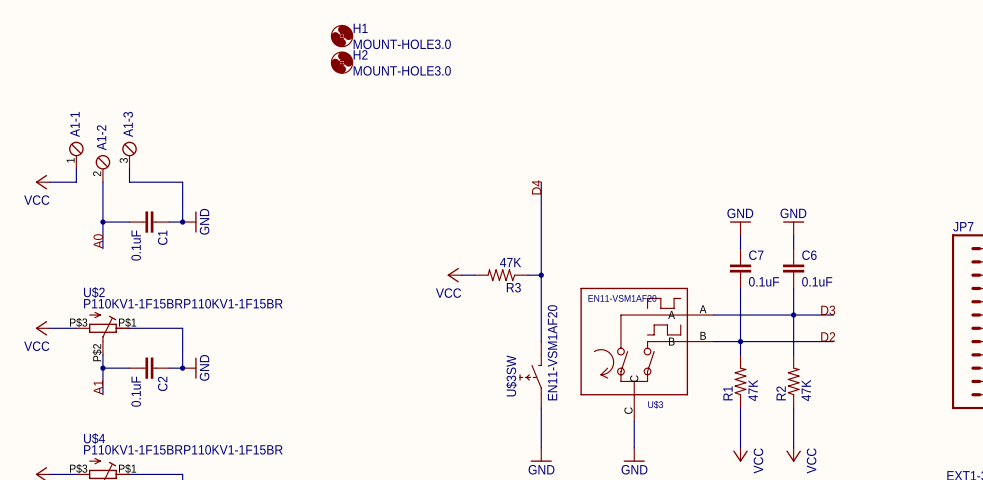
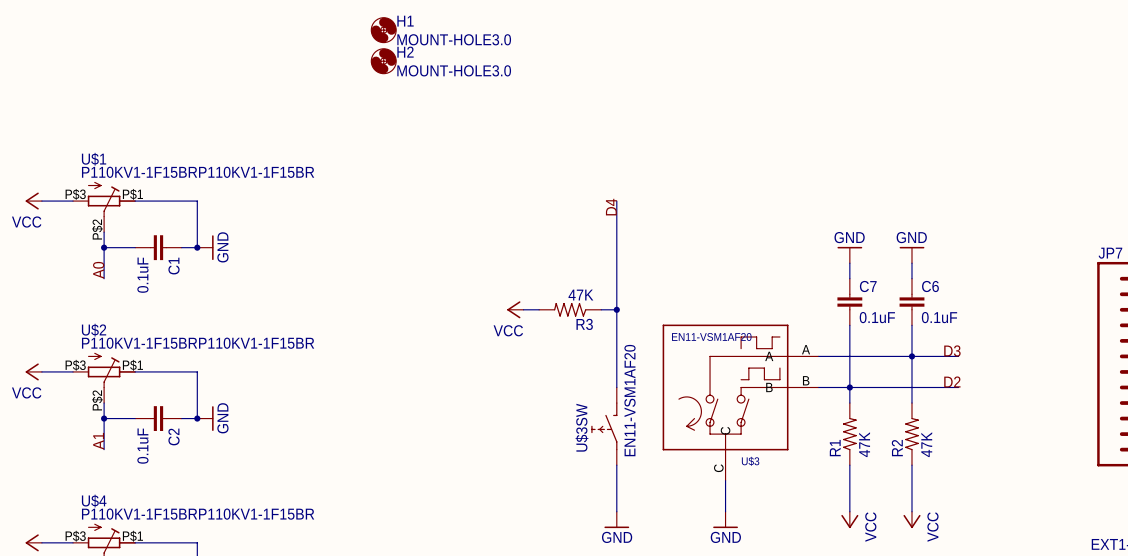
A1-1: (76, 155) -> none
A1-3: (129, 155) -> none
wire: (76, 168) (76, 182) -> none
A1-2: (102, 168) -> none
wire: (129, 168) (129, 182) -> none
U$1: none -> P110KV1-1F15BRP110KV1-1F15BR (104, 207)

